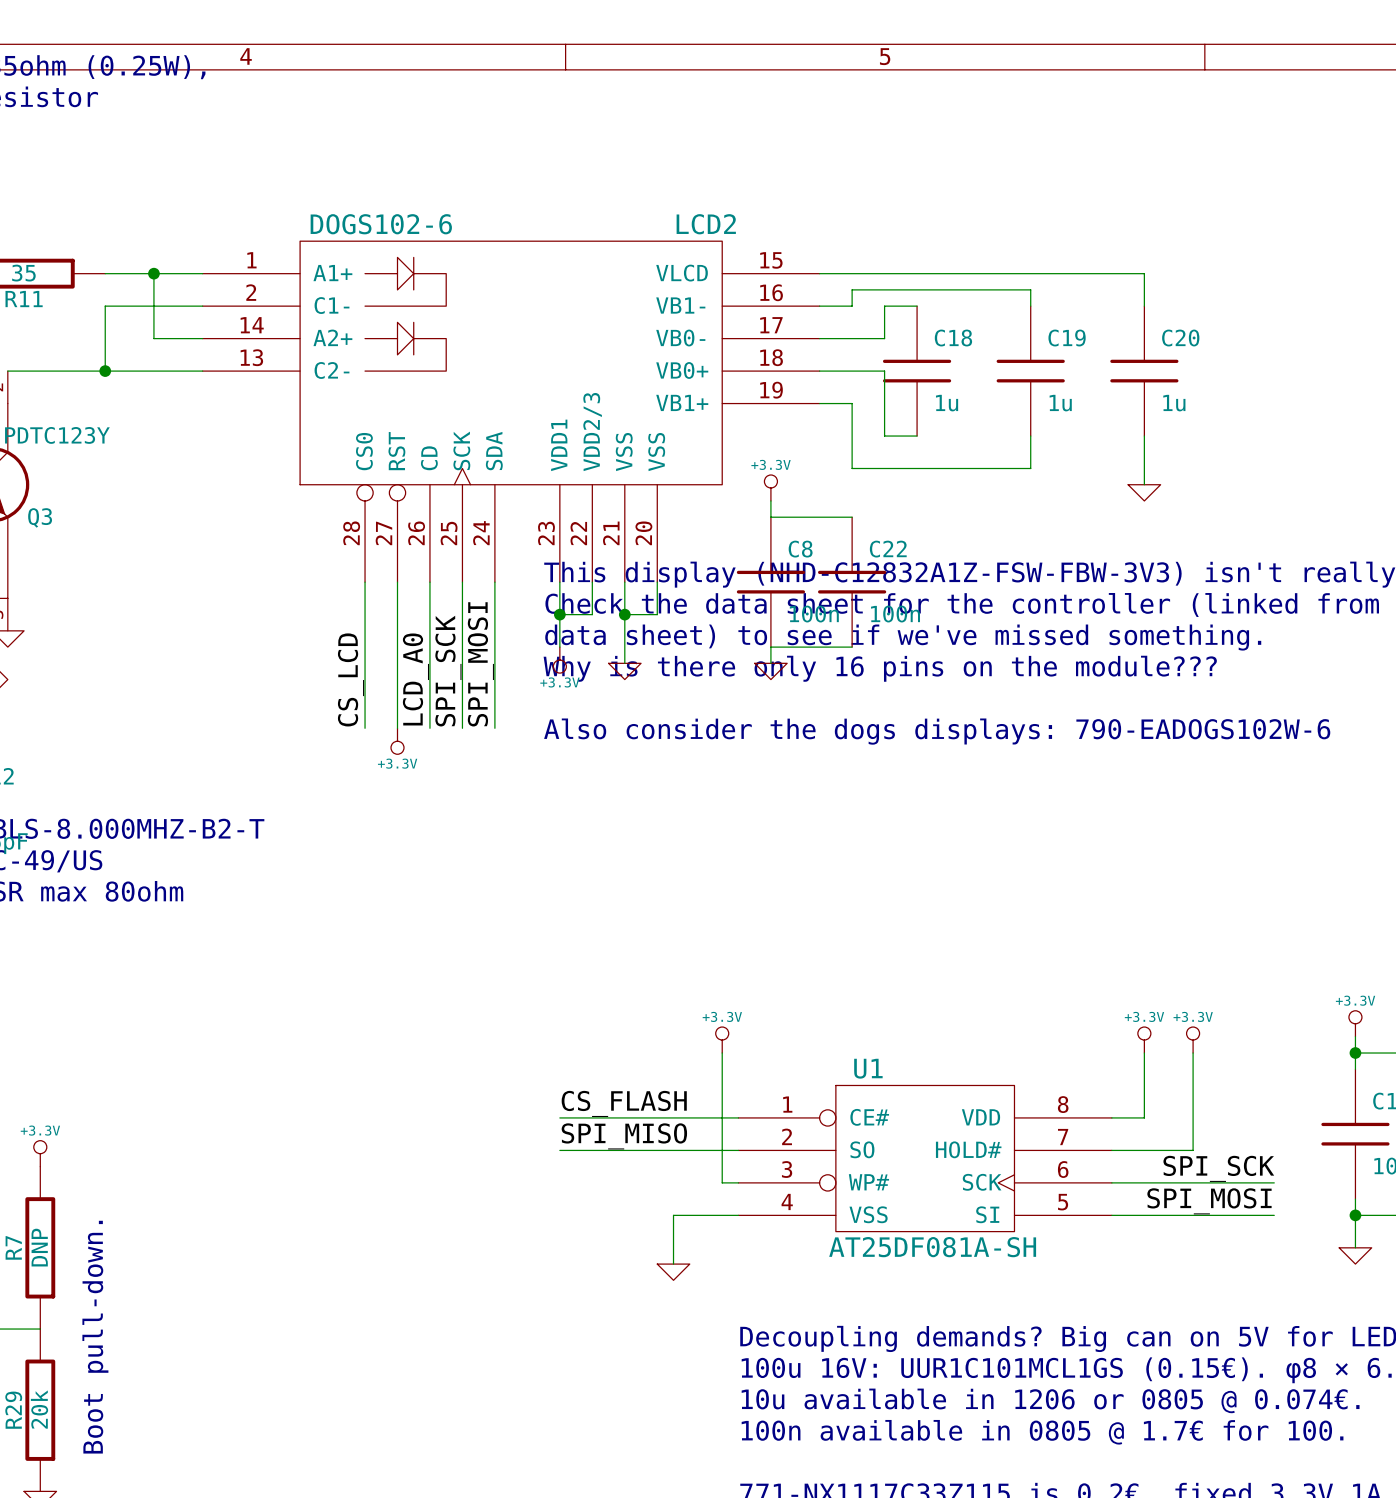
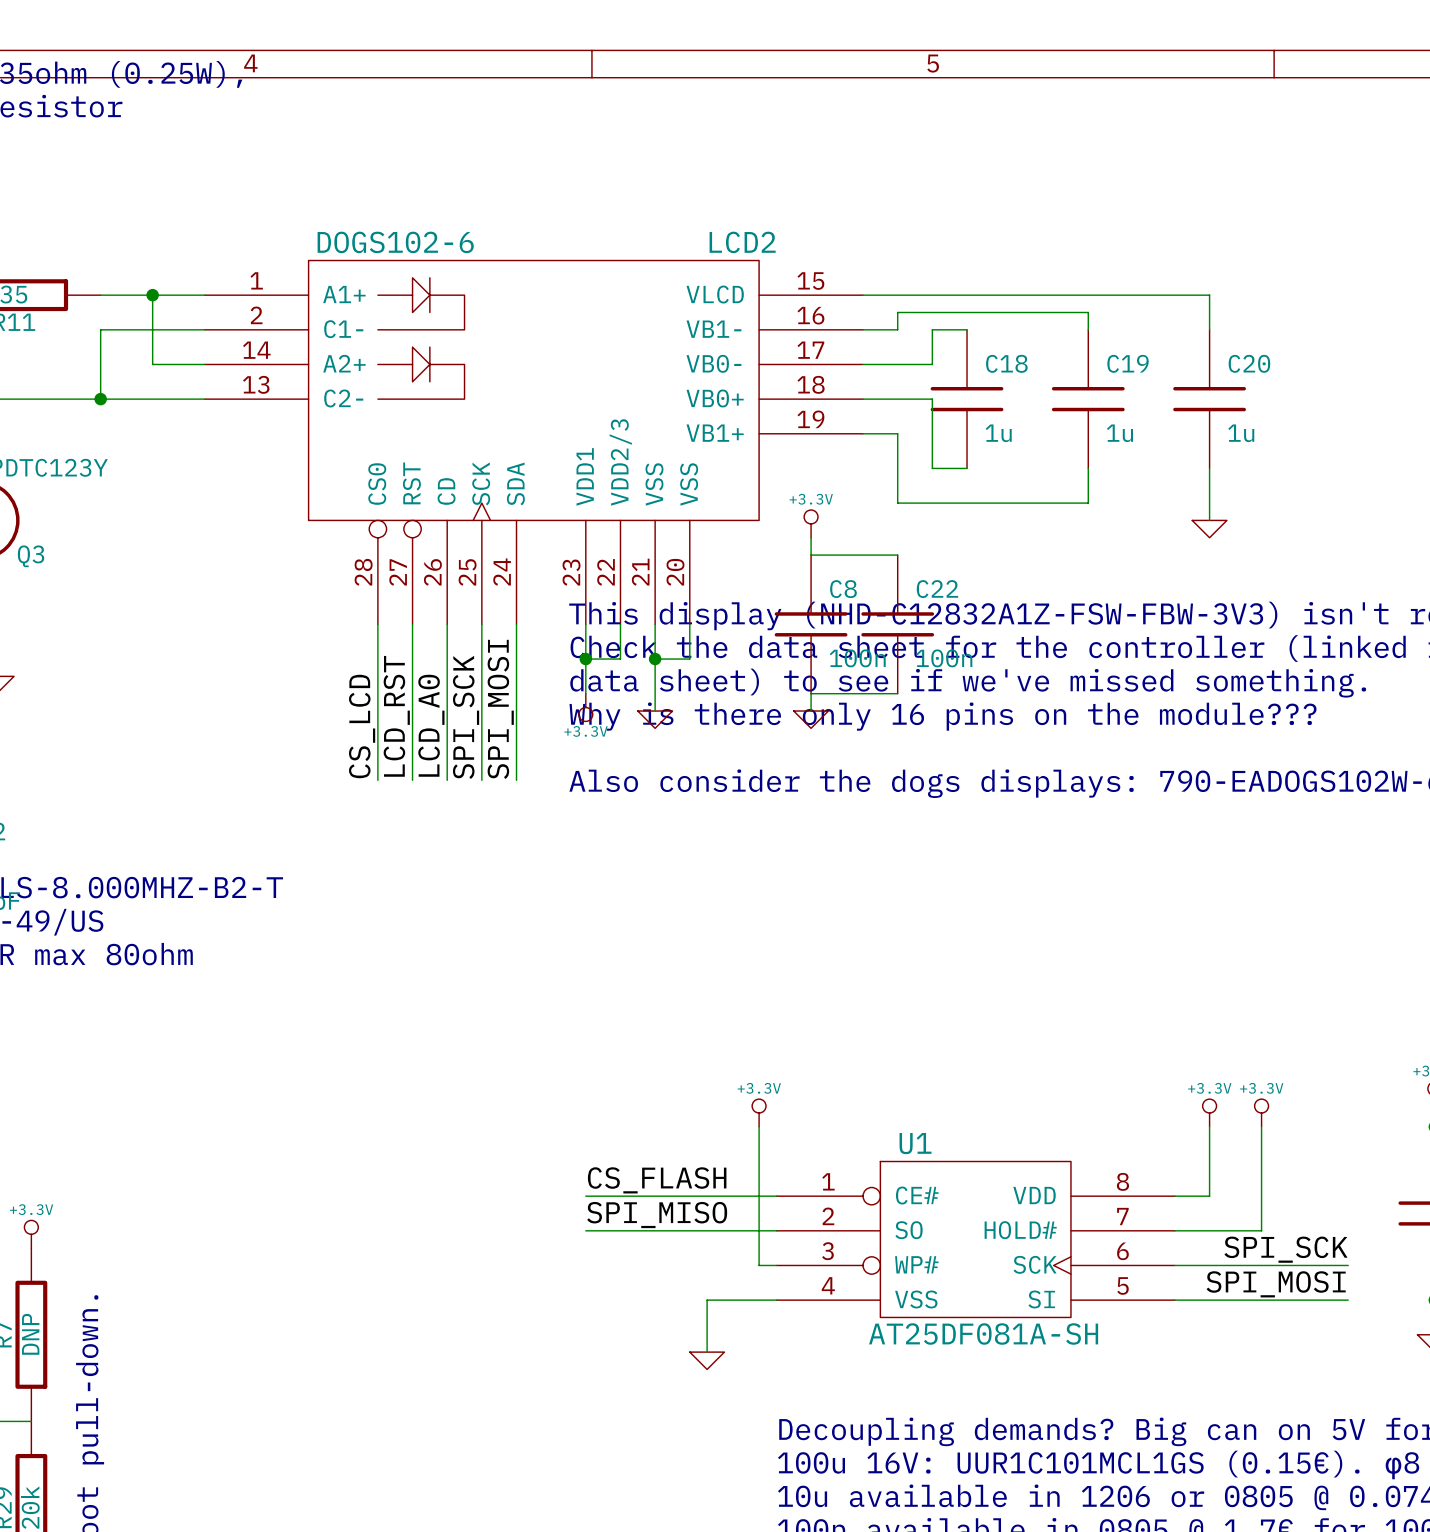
label: none -> LCD_RST (396, 716)
power symbol: +3.3V (397, 741) -> none

